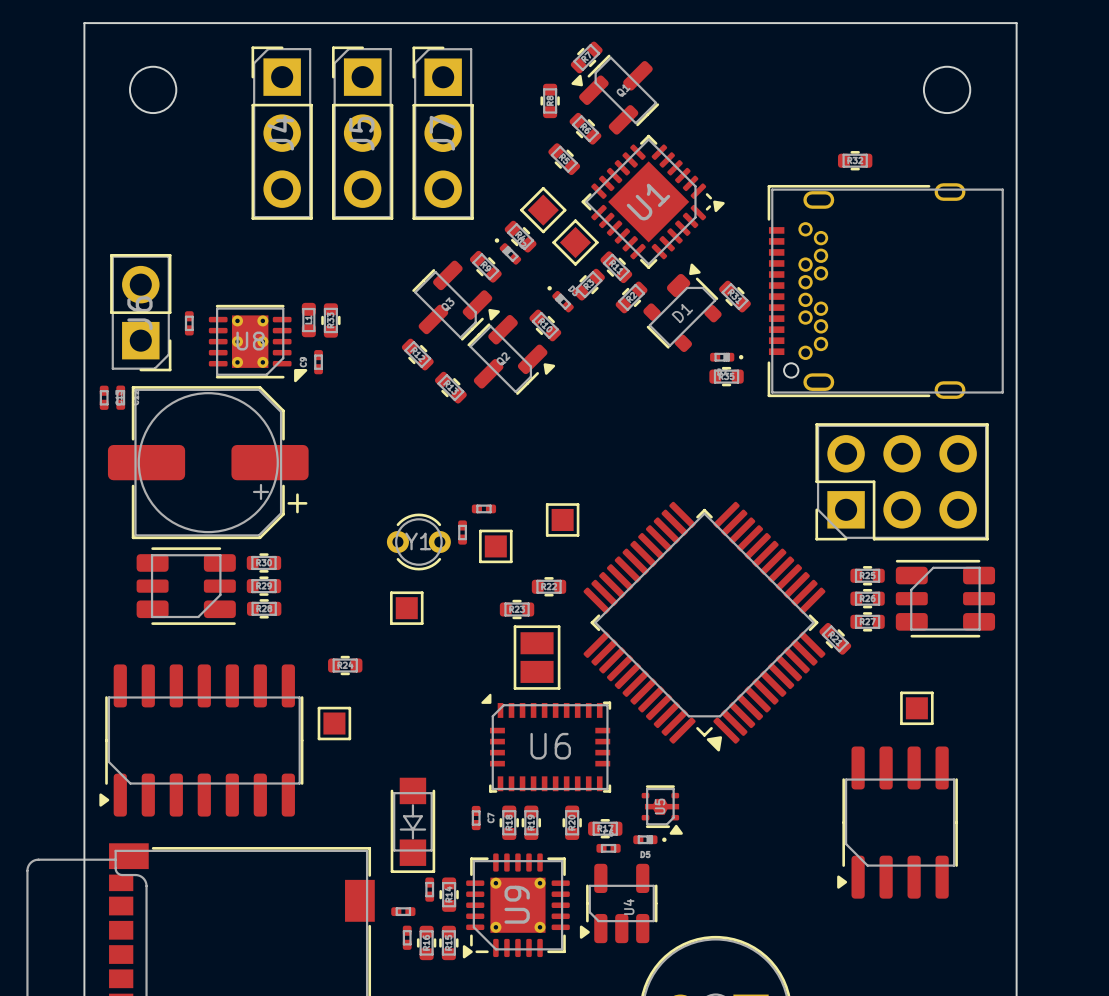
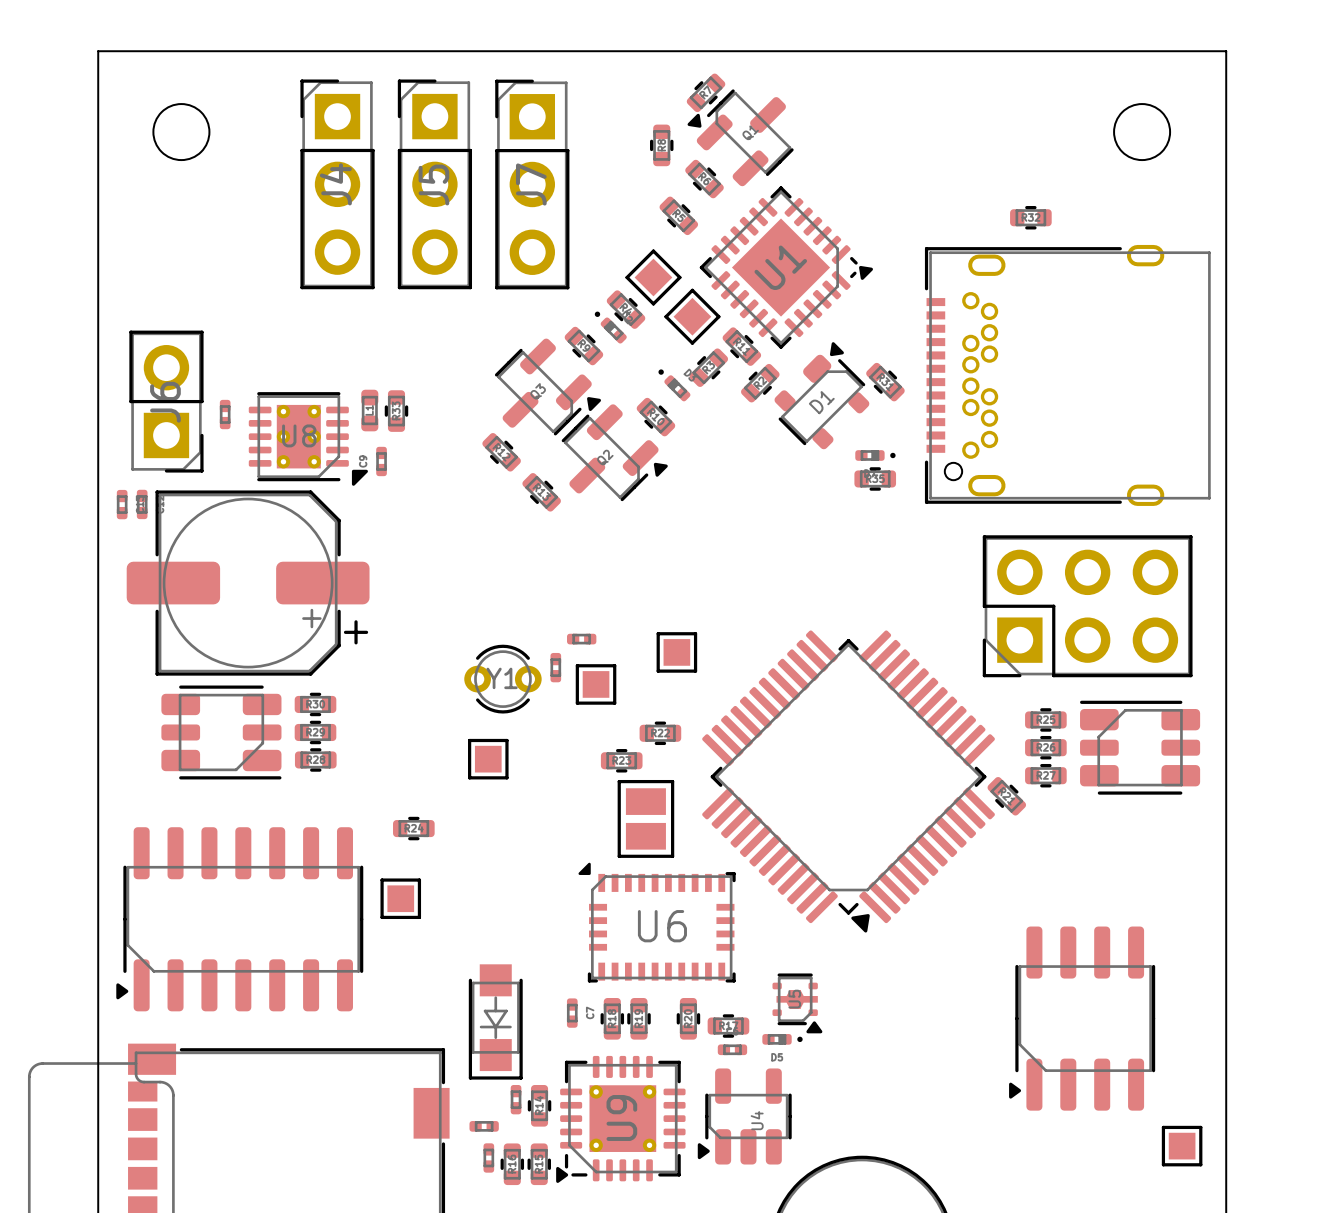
part position: (916, 708) -> (1182, 1146)

